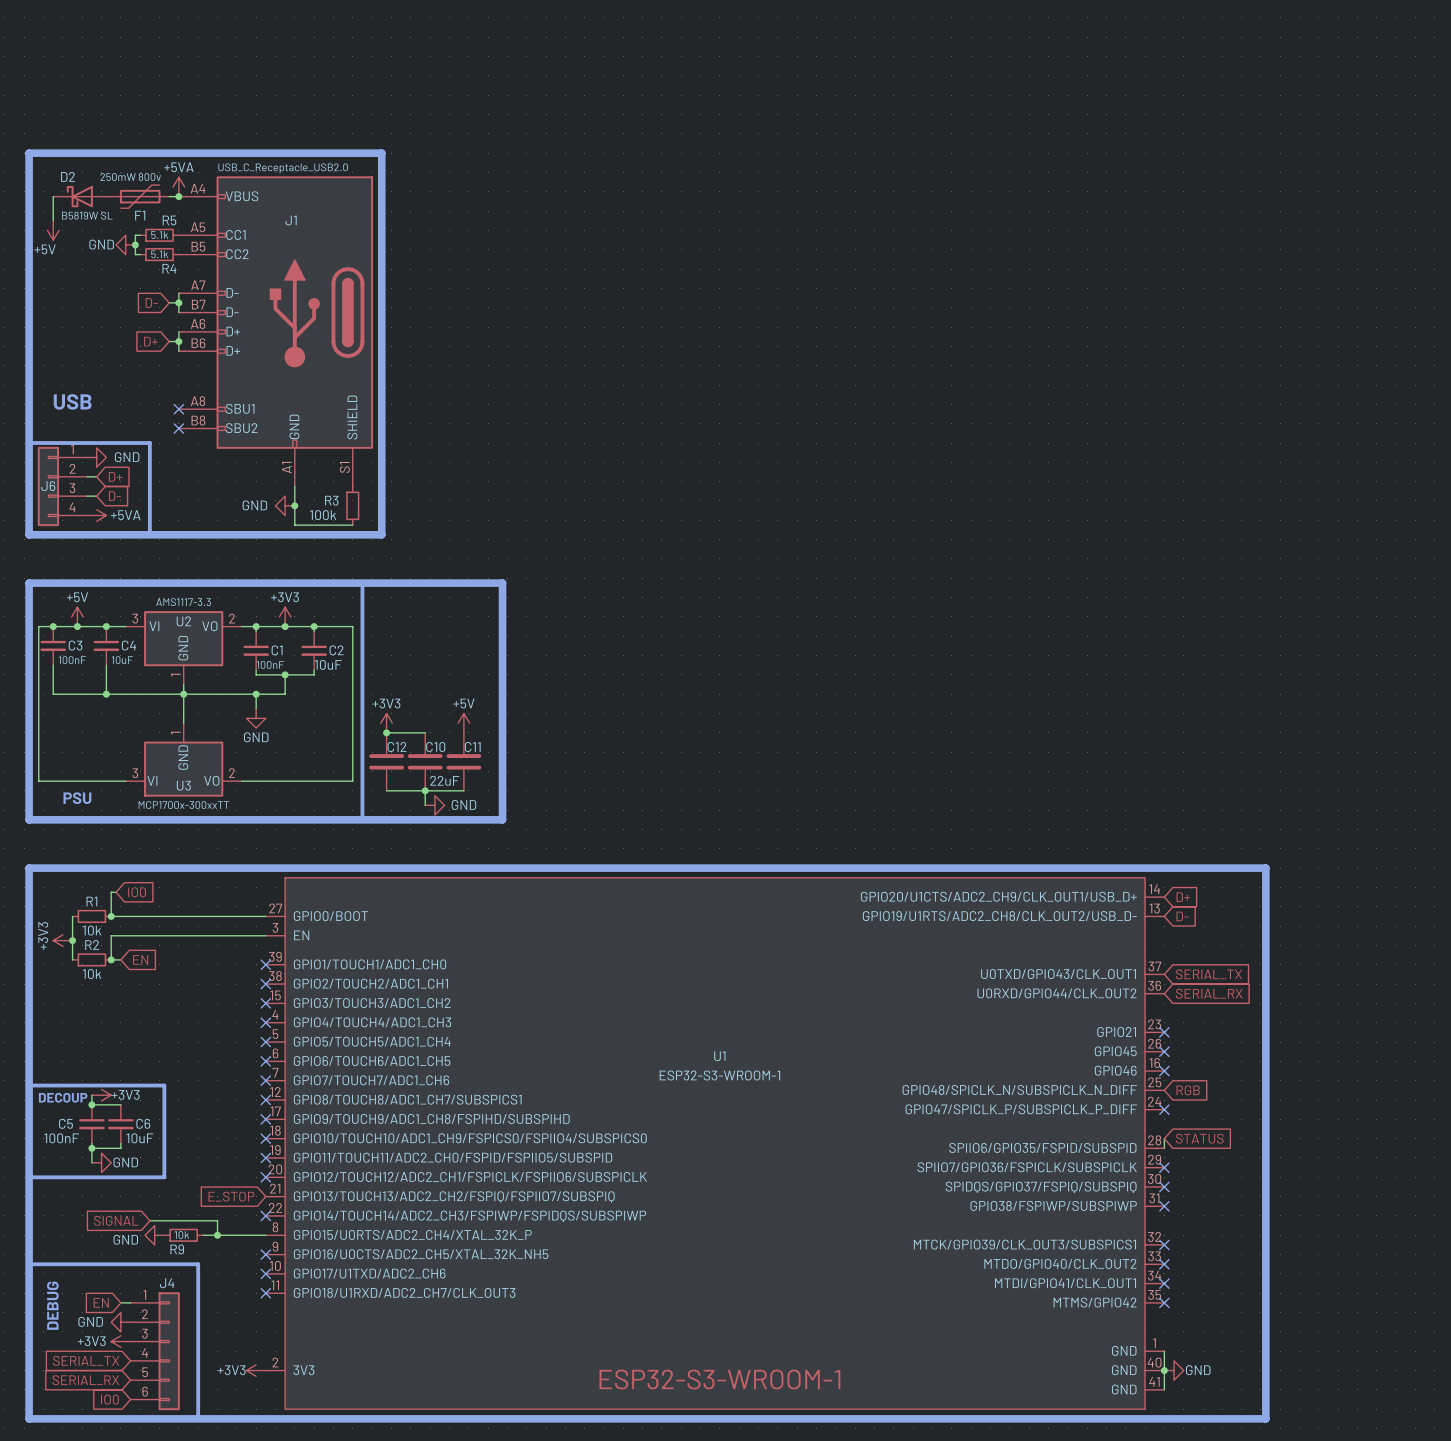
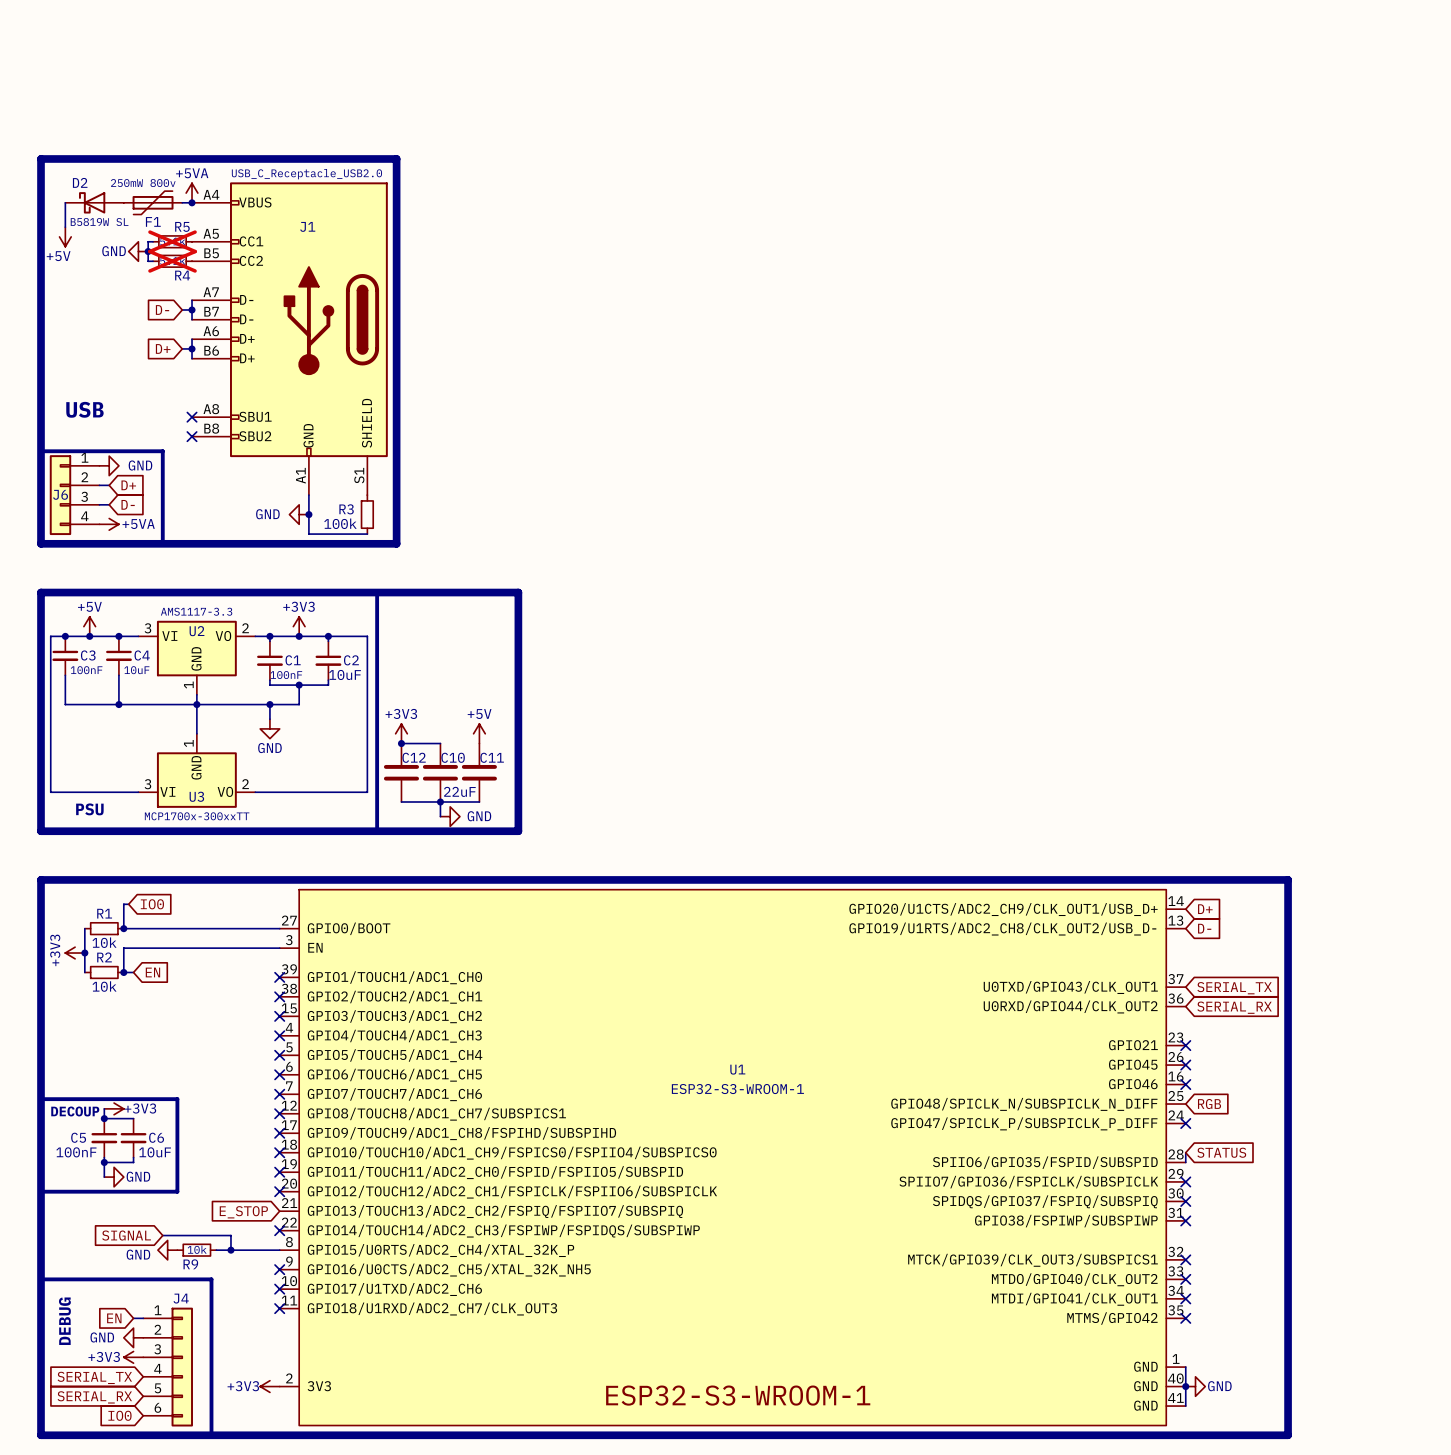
R5 do-not-place cross: none -> (172, 241)
R4 do-not-place cross: none -> (172, 261)

